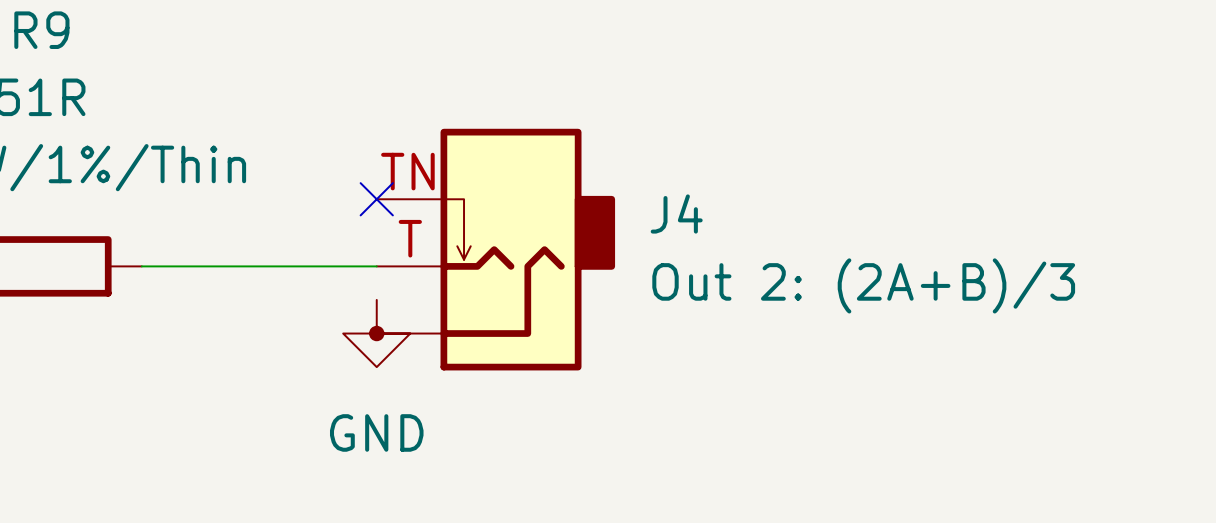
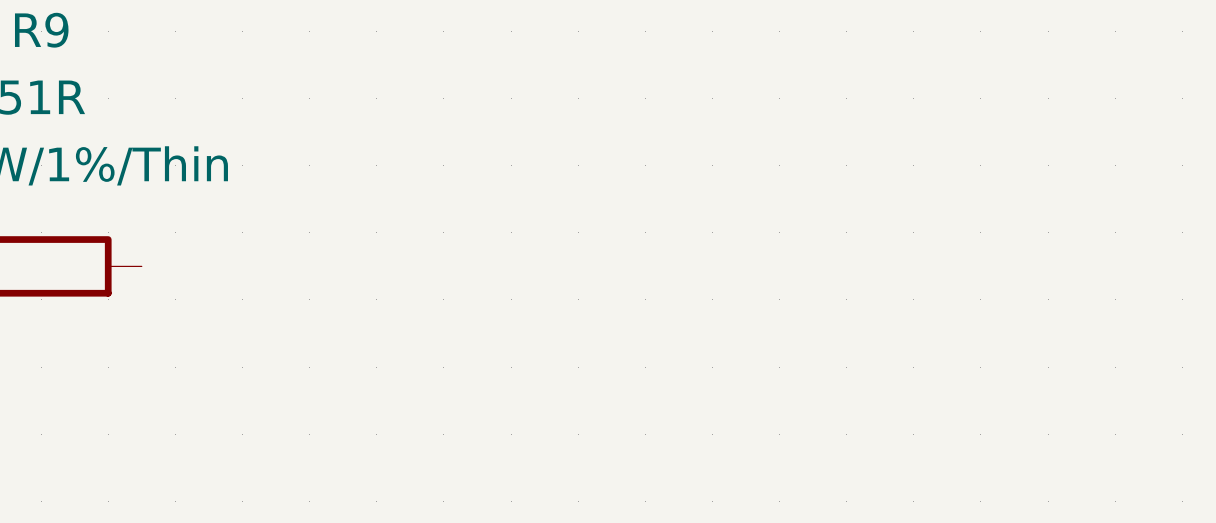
no-connect mark: (376, 199) -> none
J4: Out 2: (2A+B)/3 (492, 249) -> none
wire: (141, 266) (376, 266) -> none
power symbol: GND (376, 333) -> none

